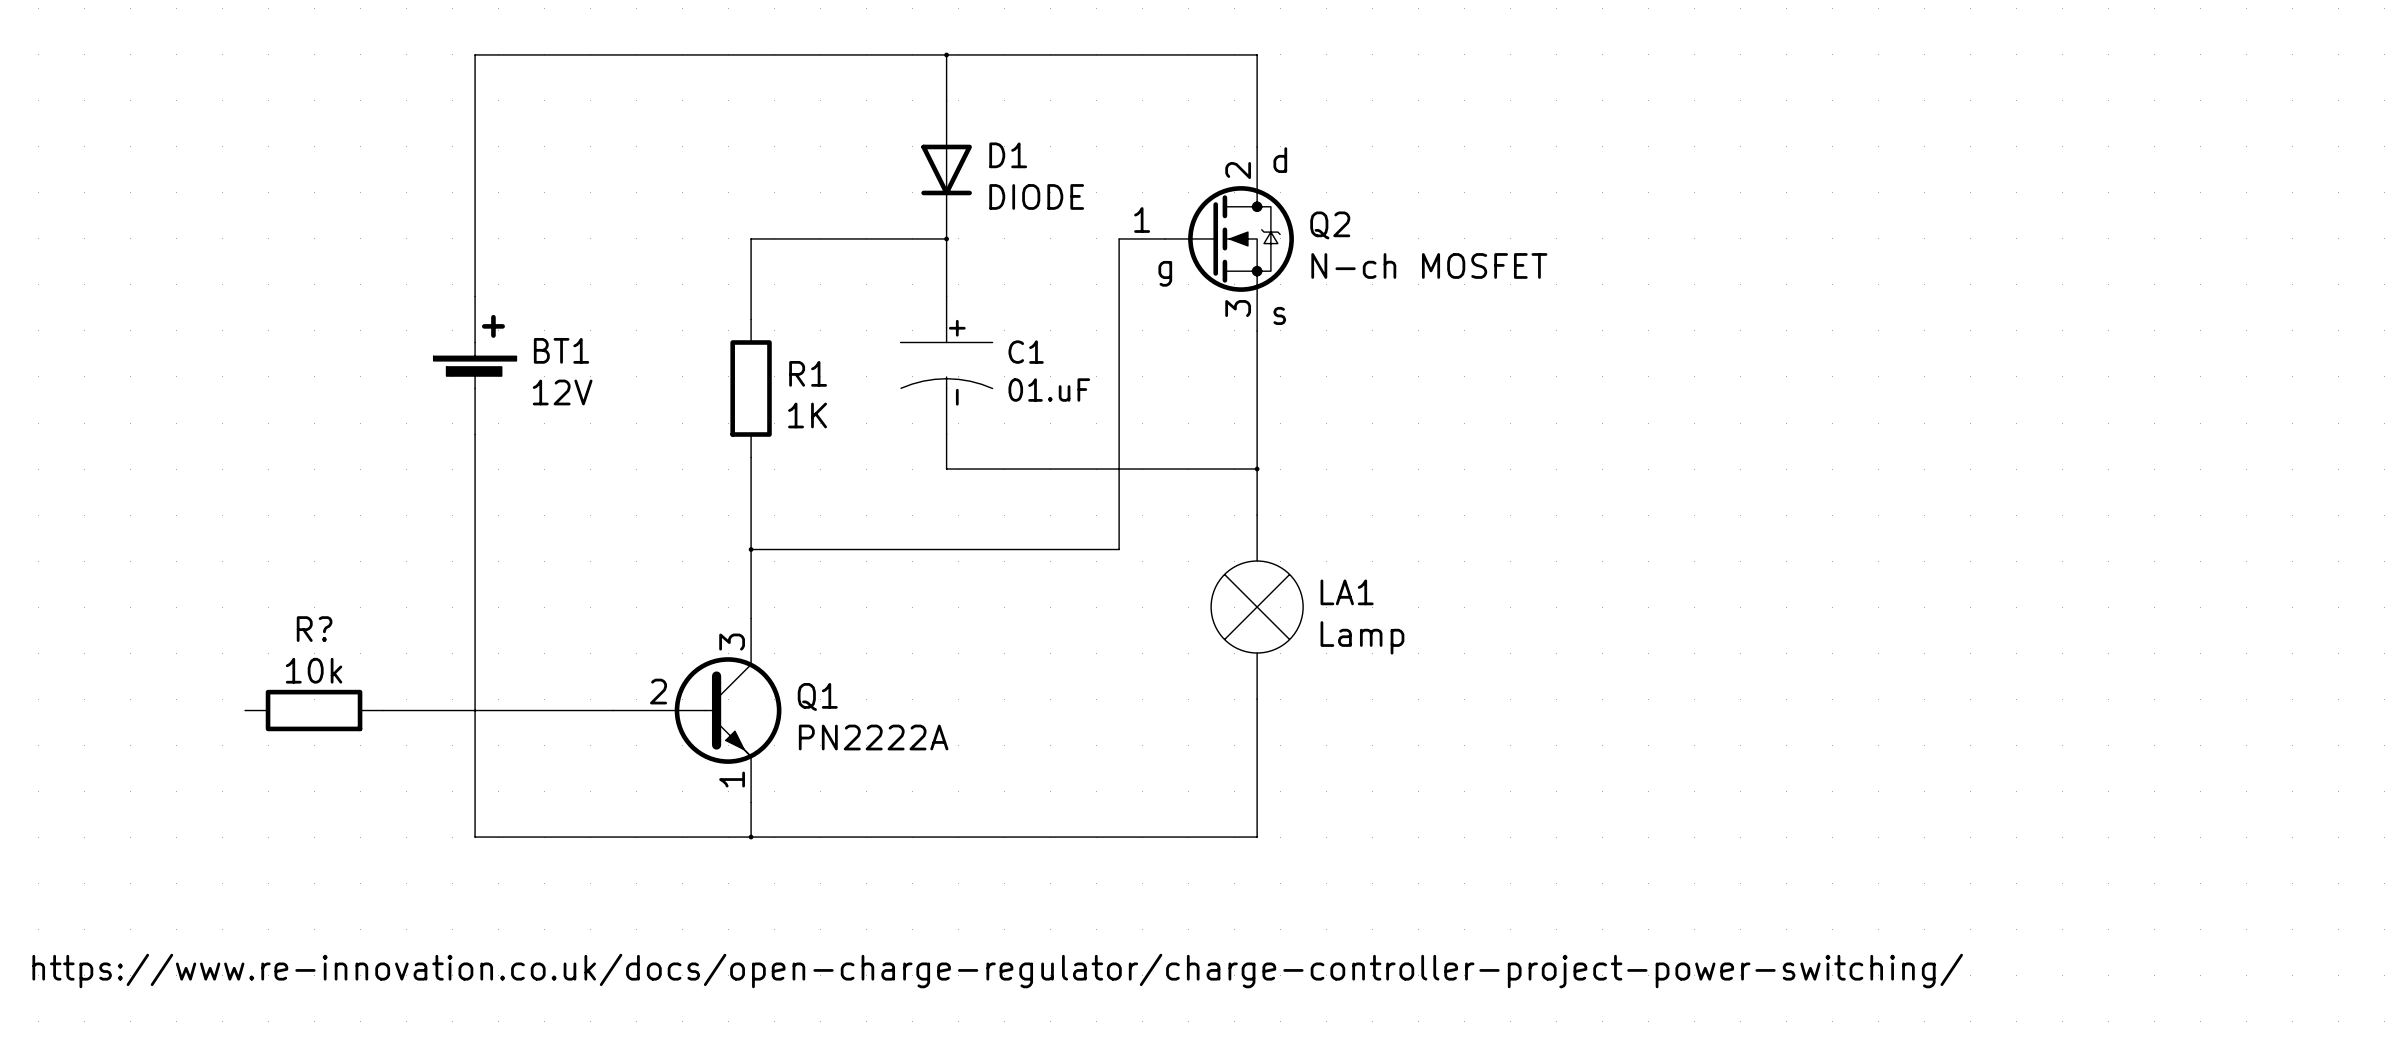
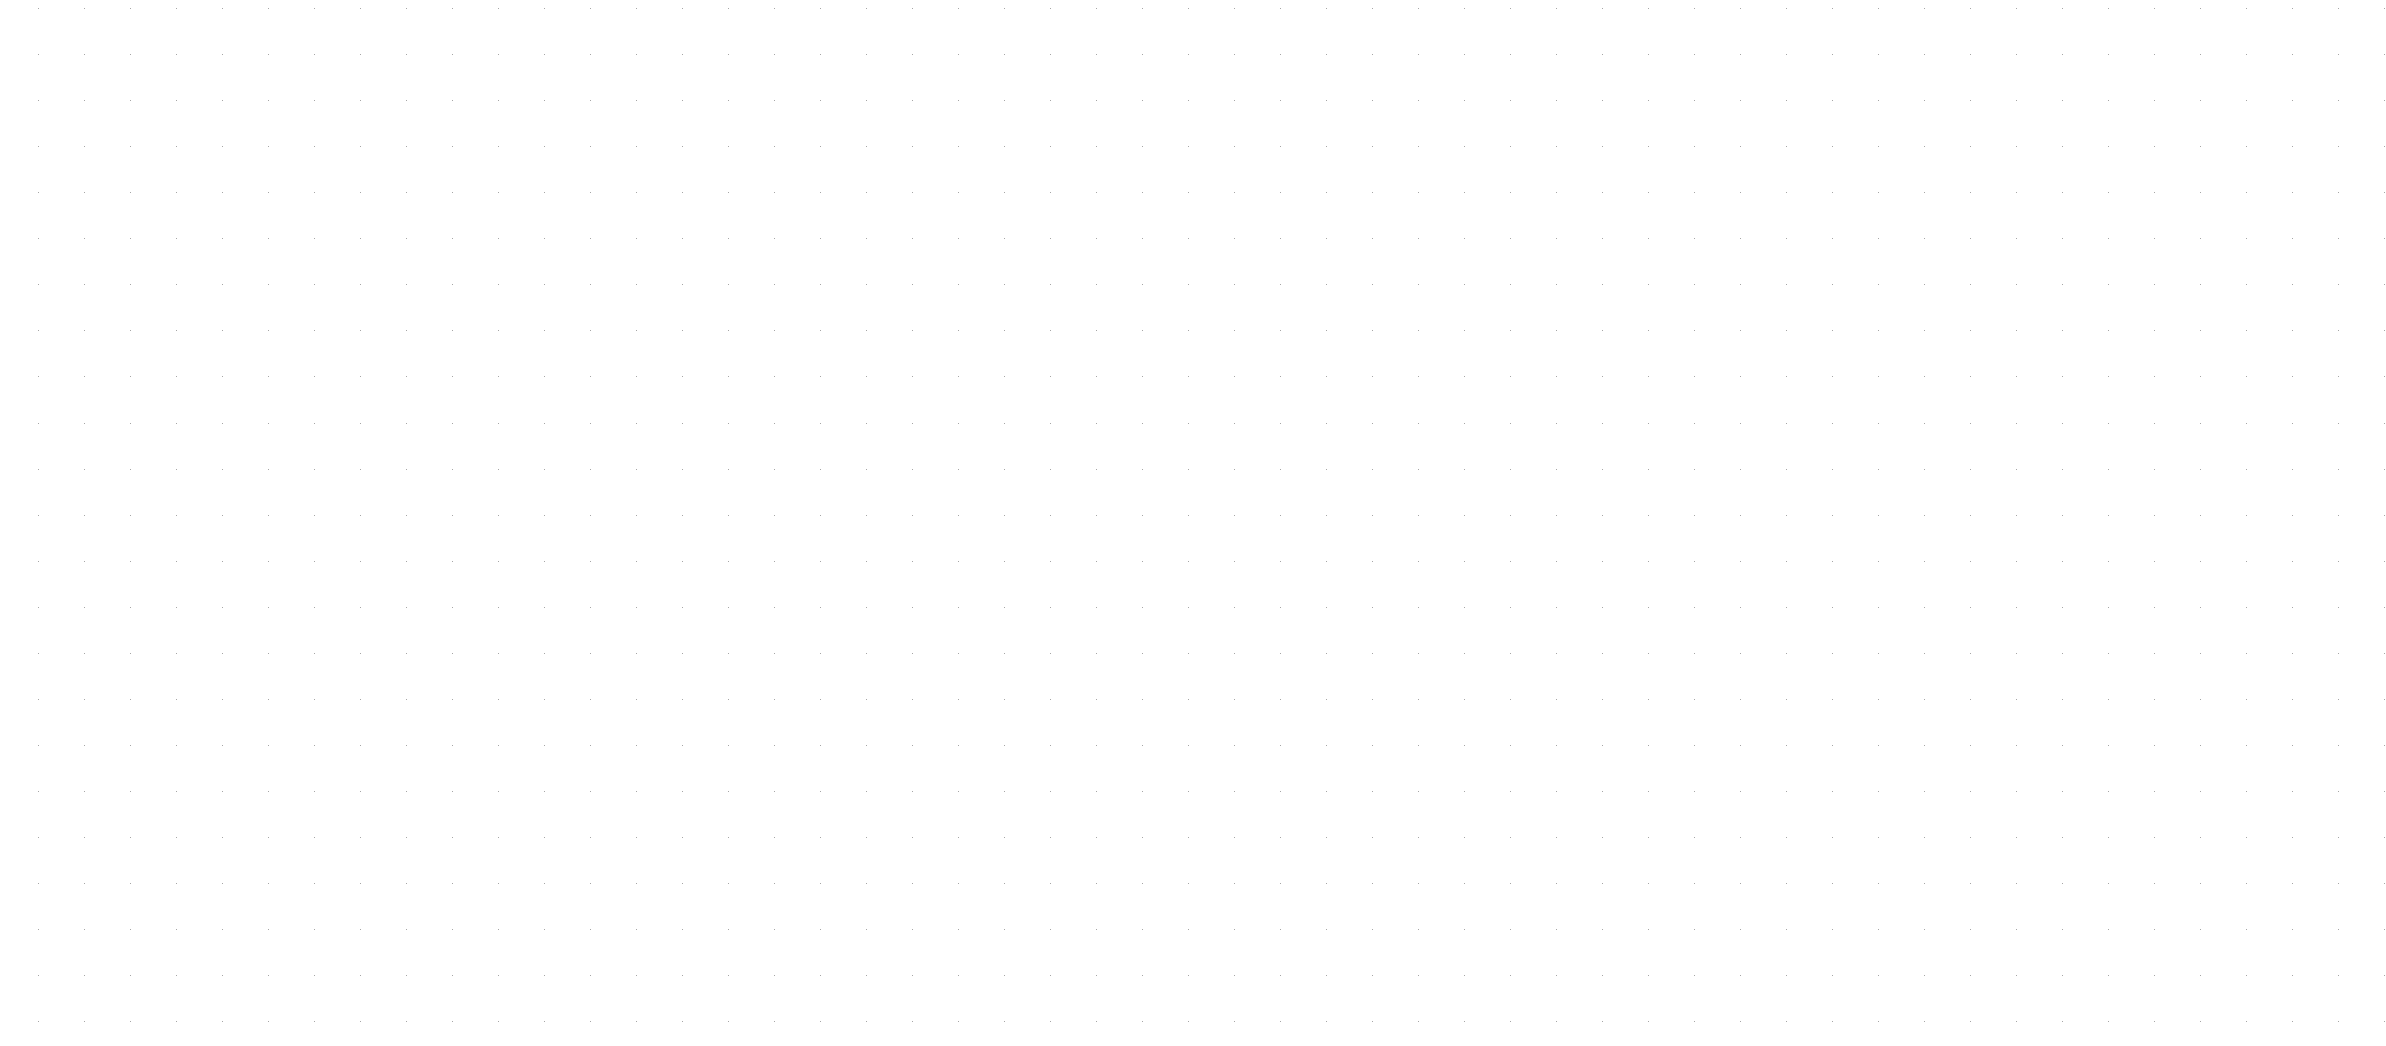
wire: (946, 54) (946, 100) -> none
junction: (946, 54) -> none
wire: (1257, 146) (1257, 54) (475, 54) (475, 296) -> none
text: d (1280, 160) -> none
D1: DIODE (946, 169) -> none
junction: (946, 238) -> none
wire: (1119, 238) (1119, 549) (751, 549) -> none
Q2: N-ch MOSFET (1206, 238) -> none
text: g (1165, 273) -> none
wire: (946, 296) (946, 238) (751, 238) (751, 319) -> none
text: s (1279, 315) -> none
wire: (1257, 330) (1257, 515) -> none
BT1: 12V (475, 365) -> none
C1: 01.uF (946, 365) -> none
R1: 1K (751, 388) -> none
wire: (475, 434) (475, 837) (1257, 837) (1257, 699) -> none
wire: (946, 434) (946, 469) (1257, 469) -> none
wire: (751, 457) (751, 618) -> none
junction: (1257, 469) -> none
junction: (751, 549) -> none
LA1: Lamp (1257, 607) -> none
R?: 10k (314, 710) -> none
wire: (383, 710) (613, 710) -> none
Q1: PN2222A (697, 710) -> none
wire: (751, 802) (751, 837) -> none
junction: (751, 837) -> none
text: https://www.re-innovation.co.uk/docs/open-charge-regulator/charge-controller-project-power-switching/ (997, 970) -> none

